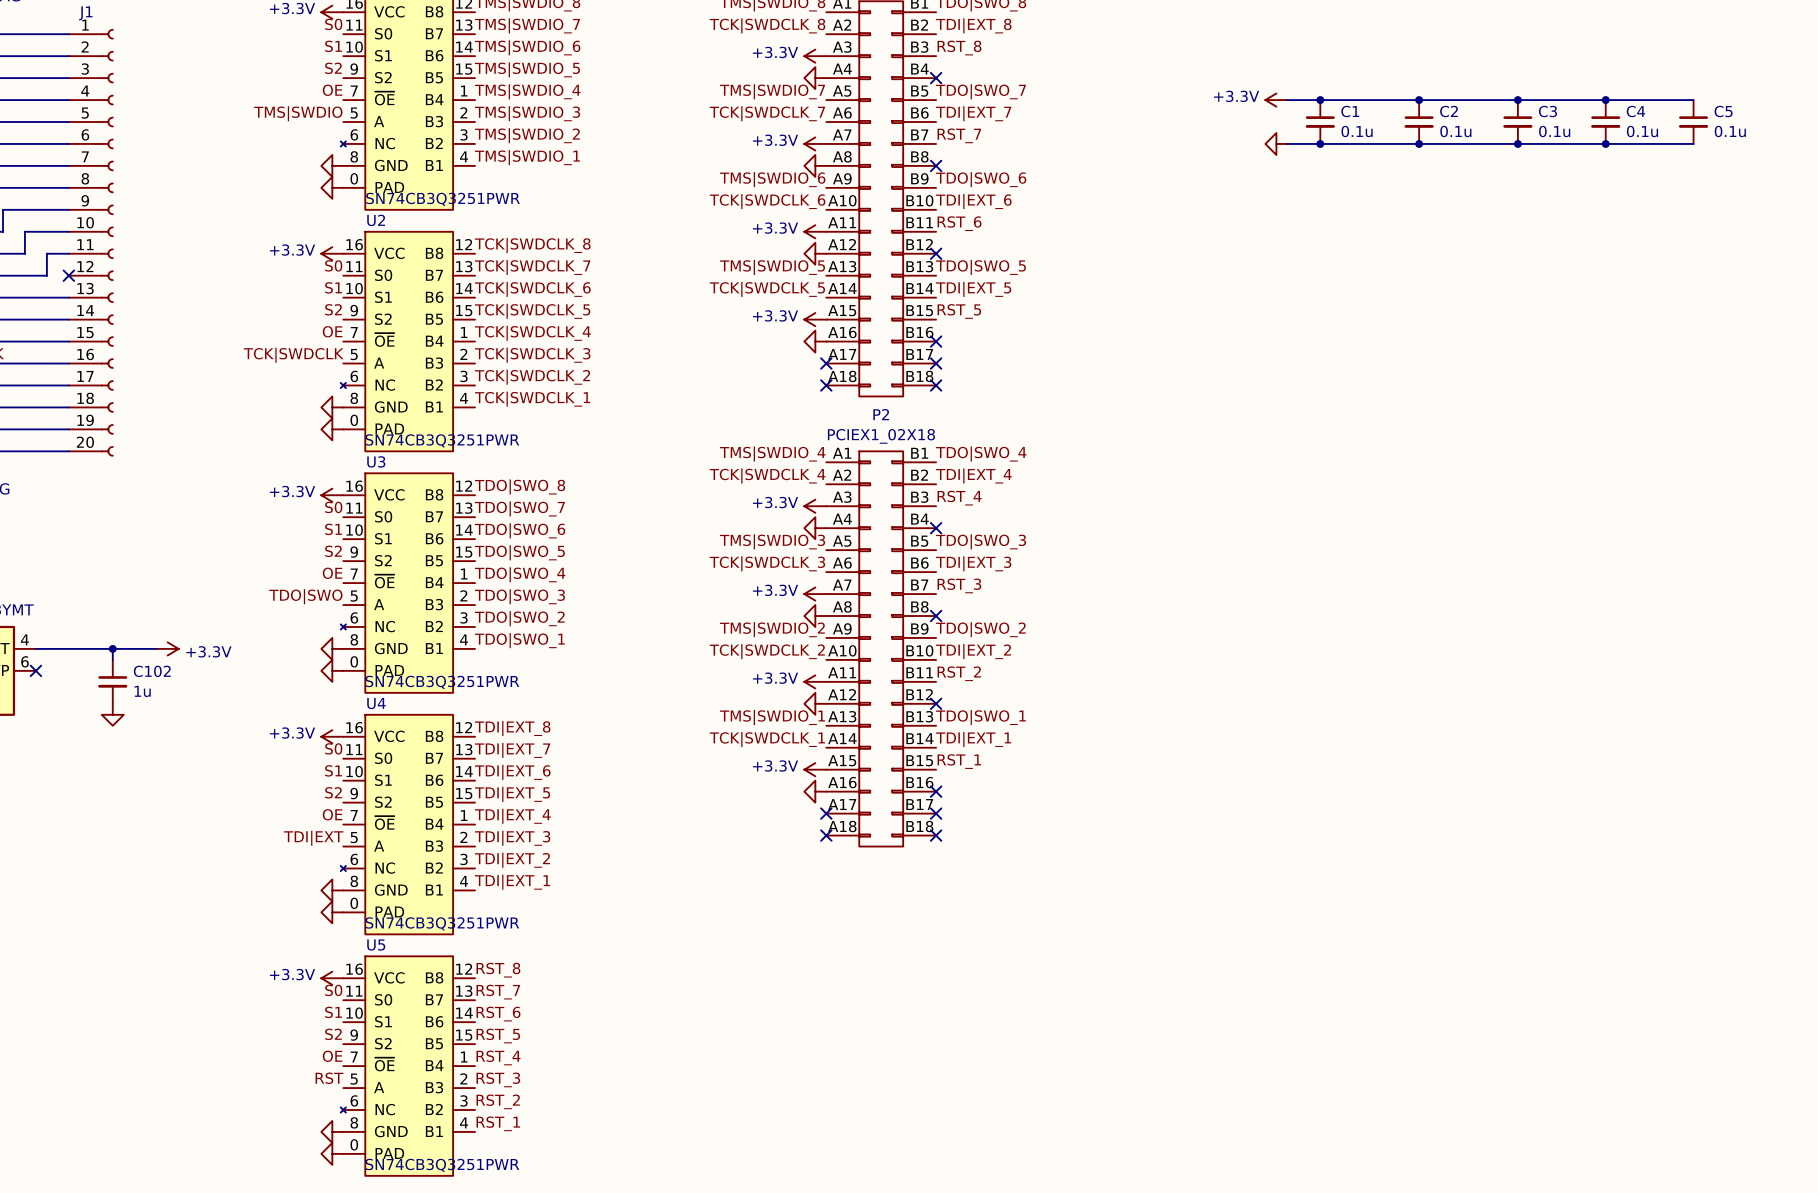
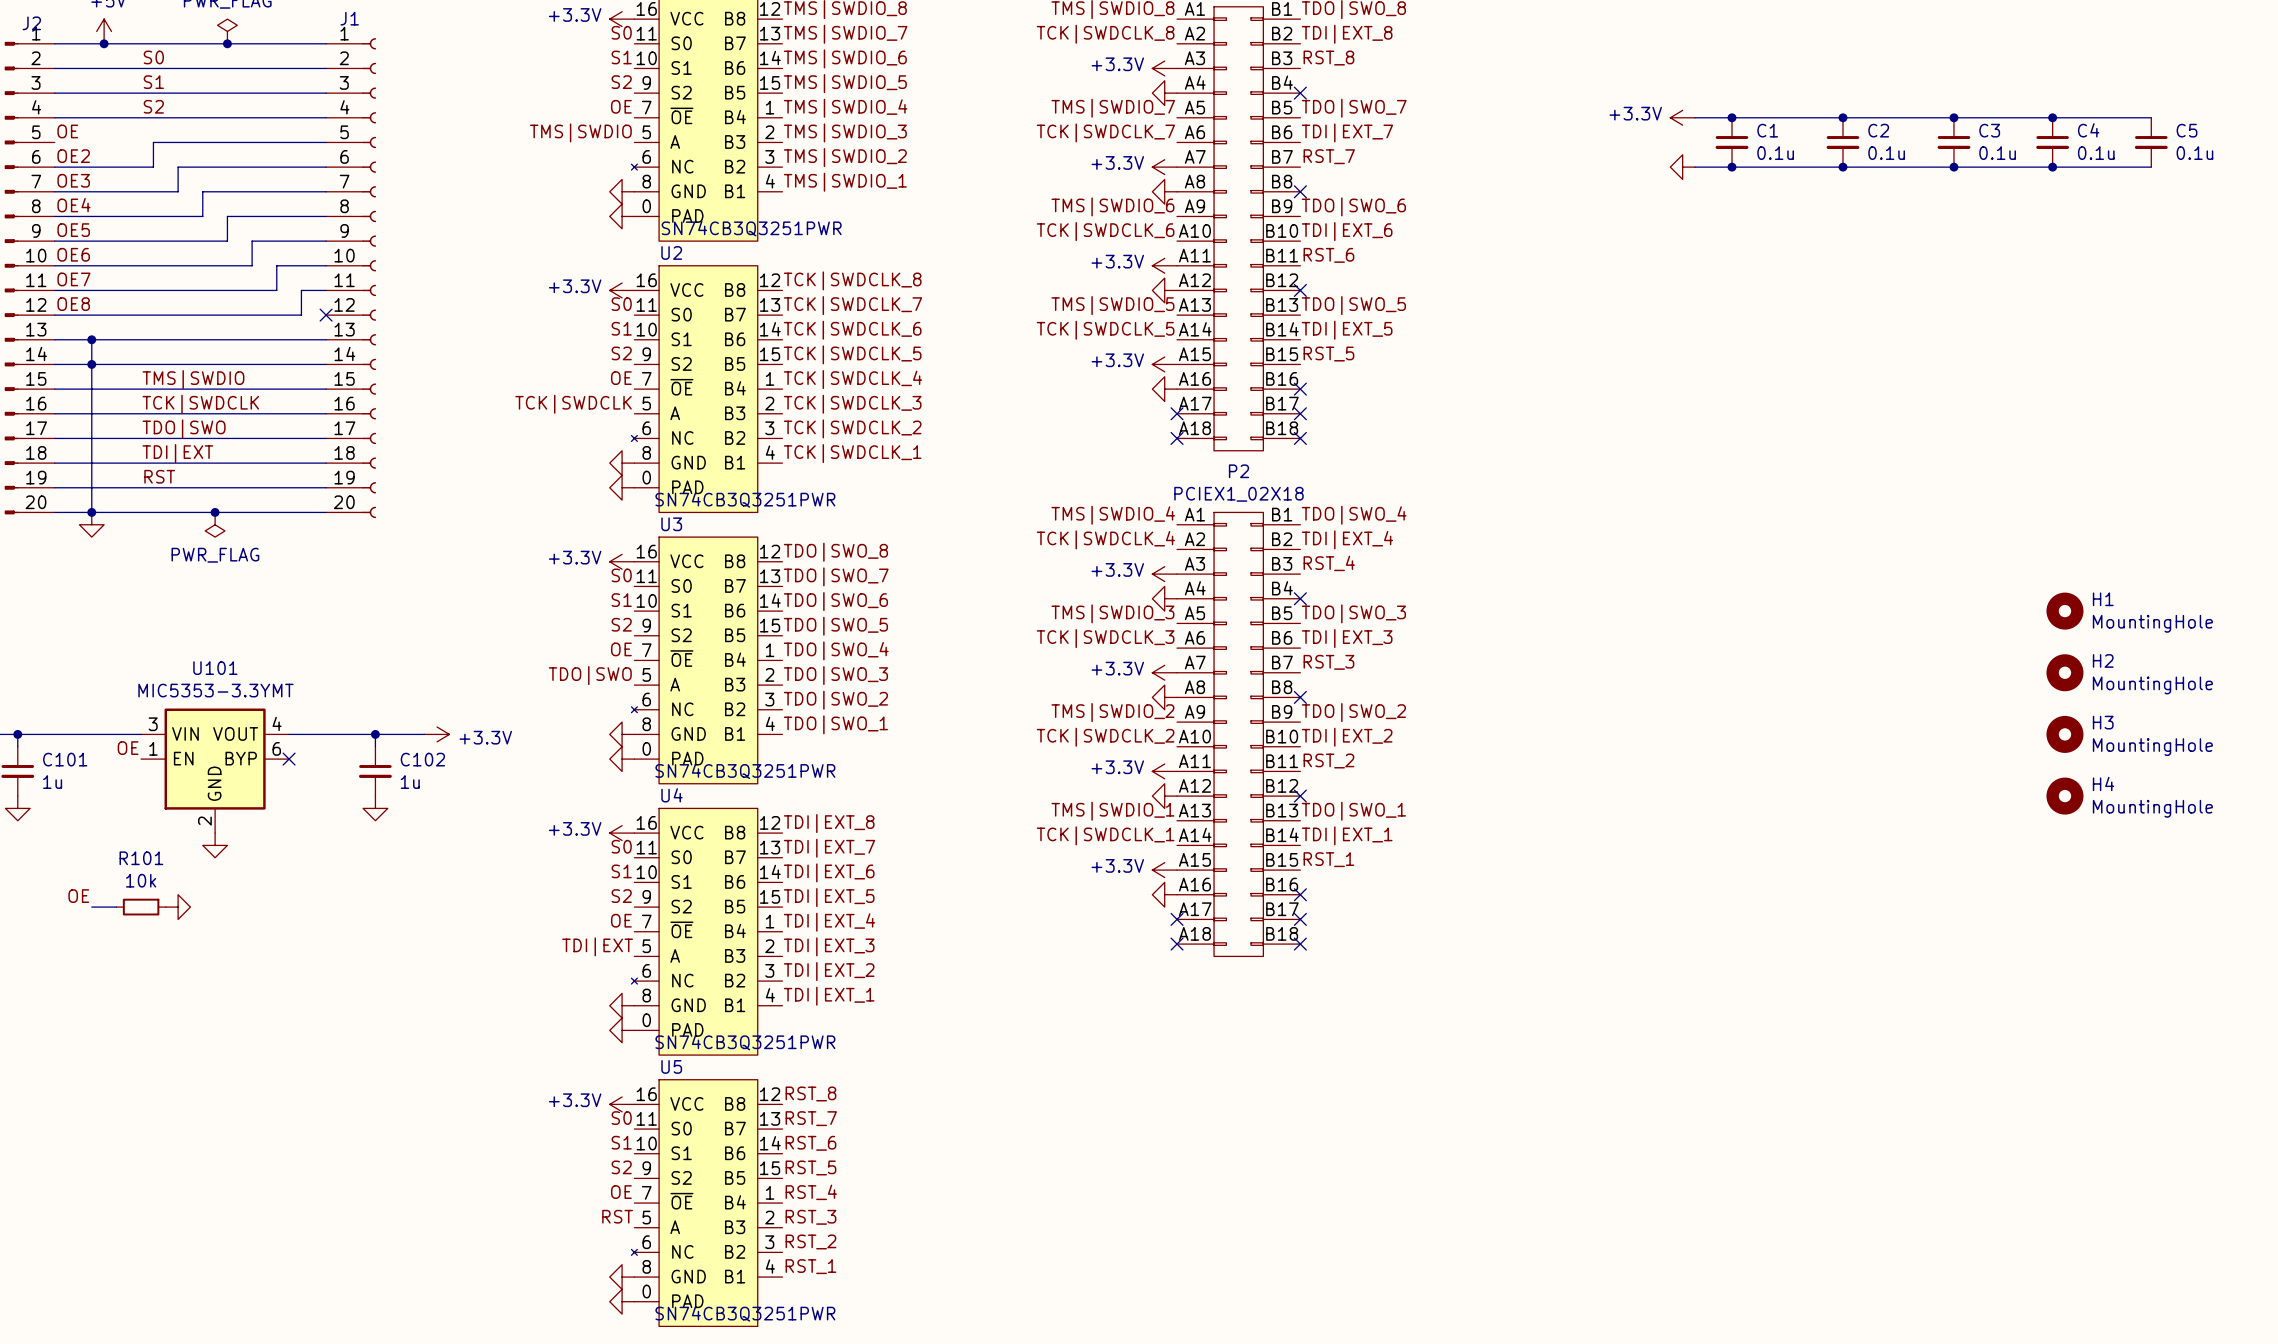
H1: none -> MountingHole (2064, 611)
H2: none -> MountingHole (2064, 672)
H3: none -> MountingHole (2064, 734)
H4: none -> MountingHole (2064, 796)

